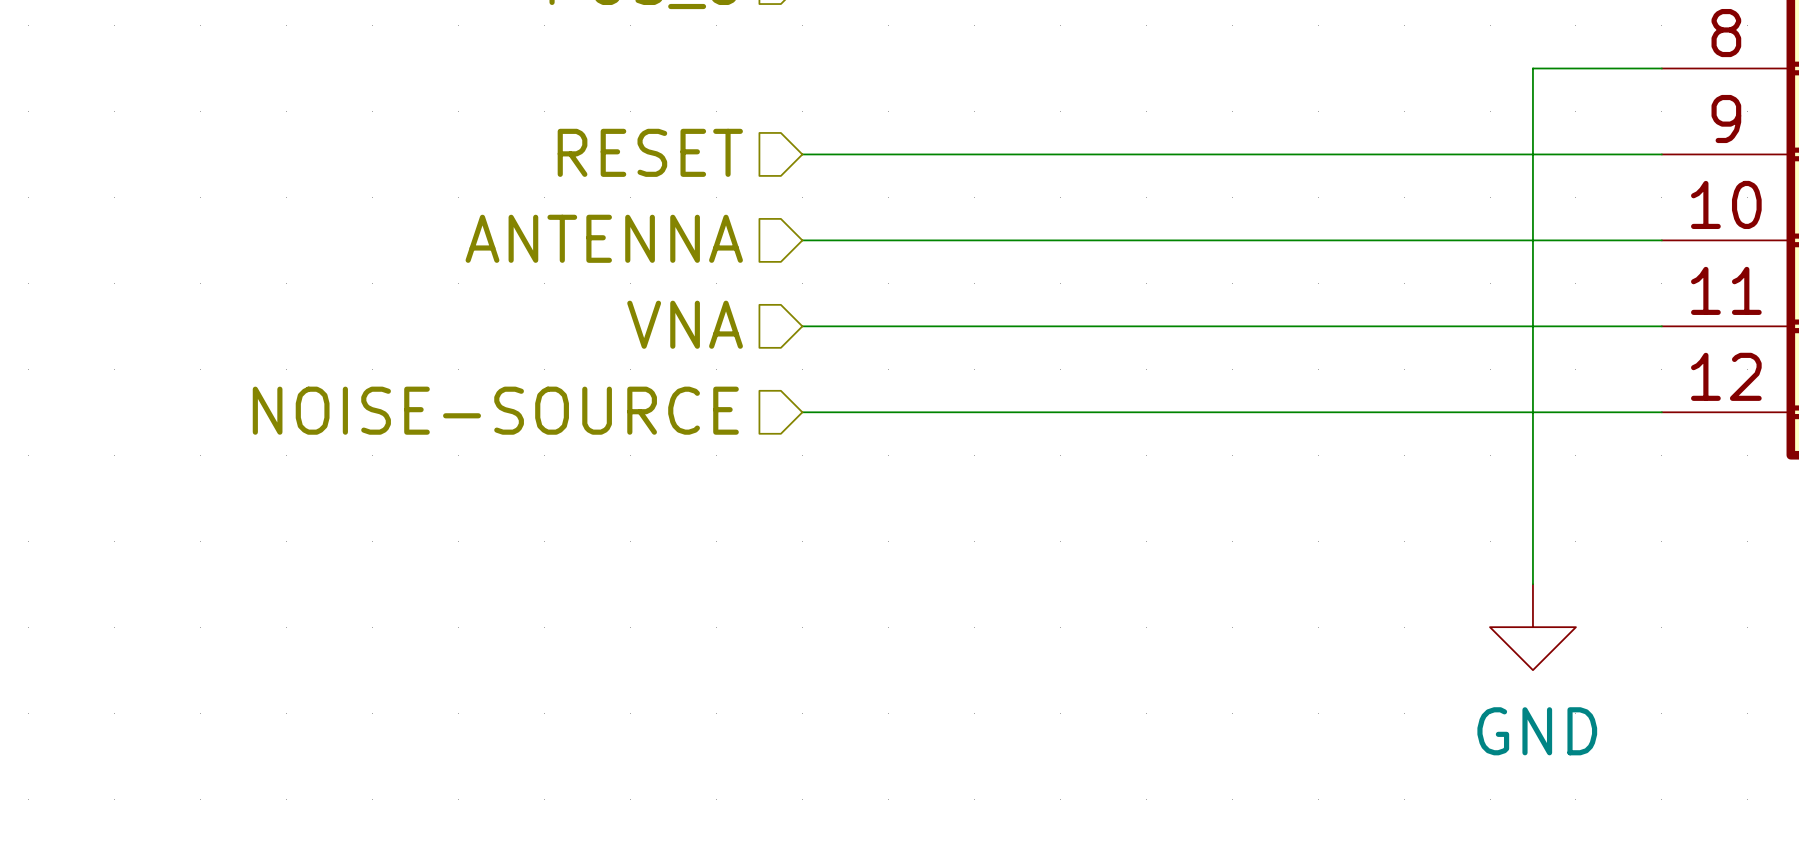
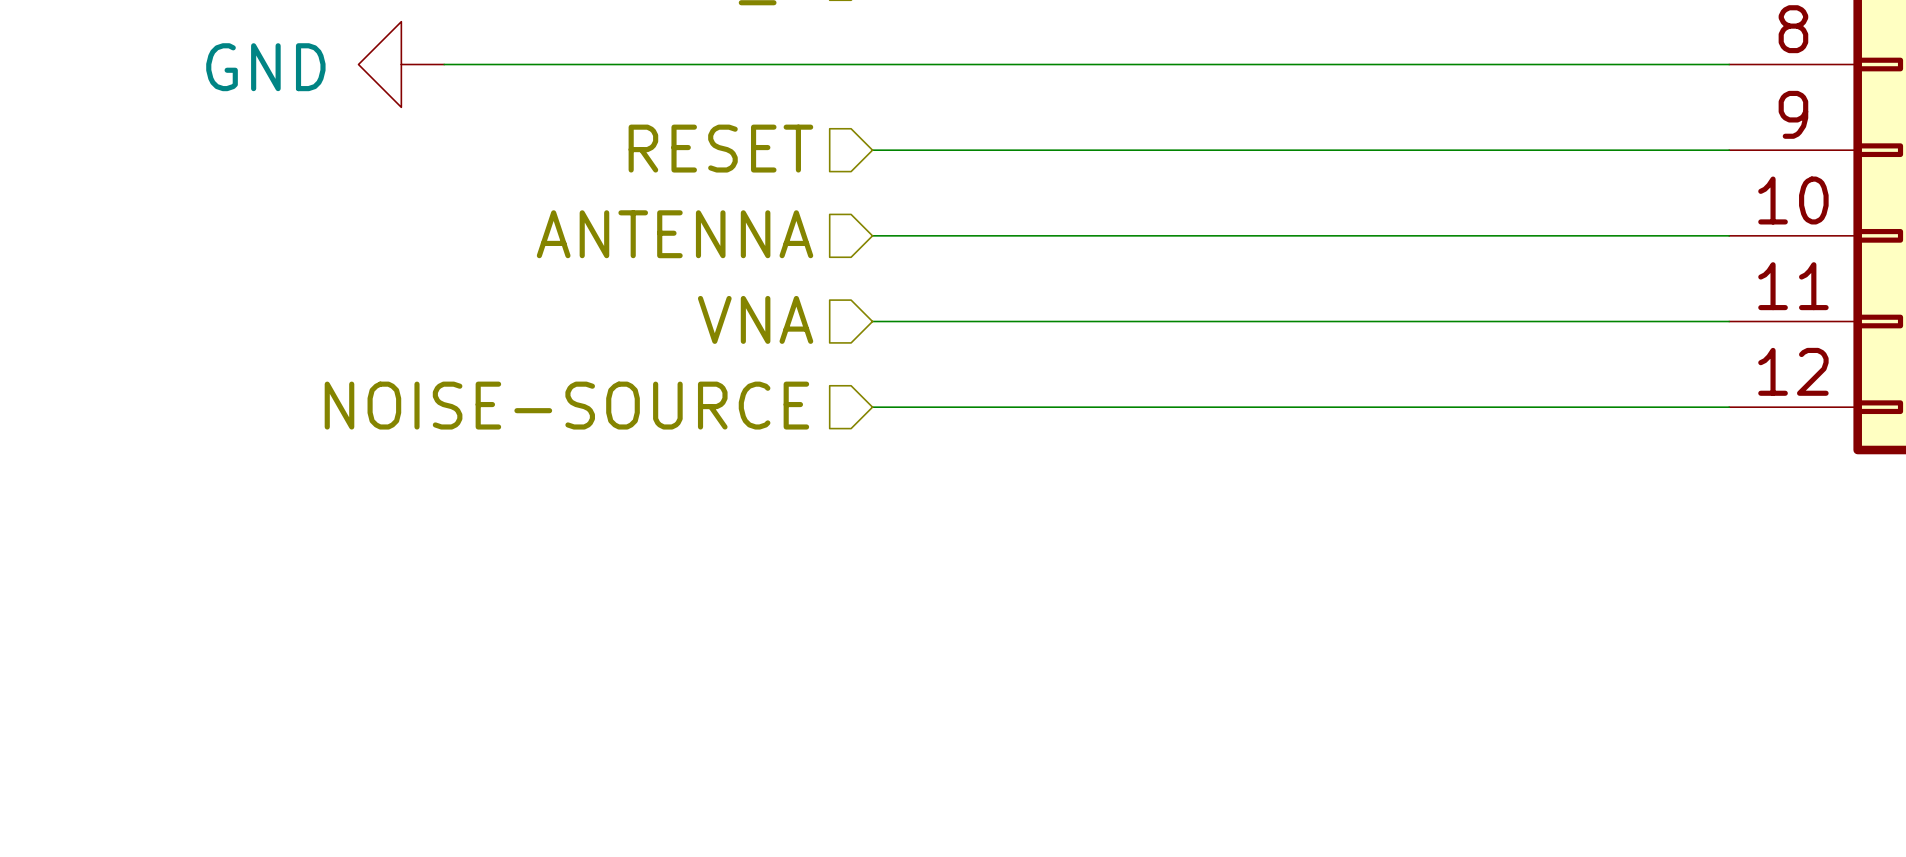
power symbol: none -> GND (401, 64)
wire: (1532, 68) (1532, 584) -> (1600, 64) (444, 64)
power symbol: GND (1532, 627) -> none

